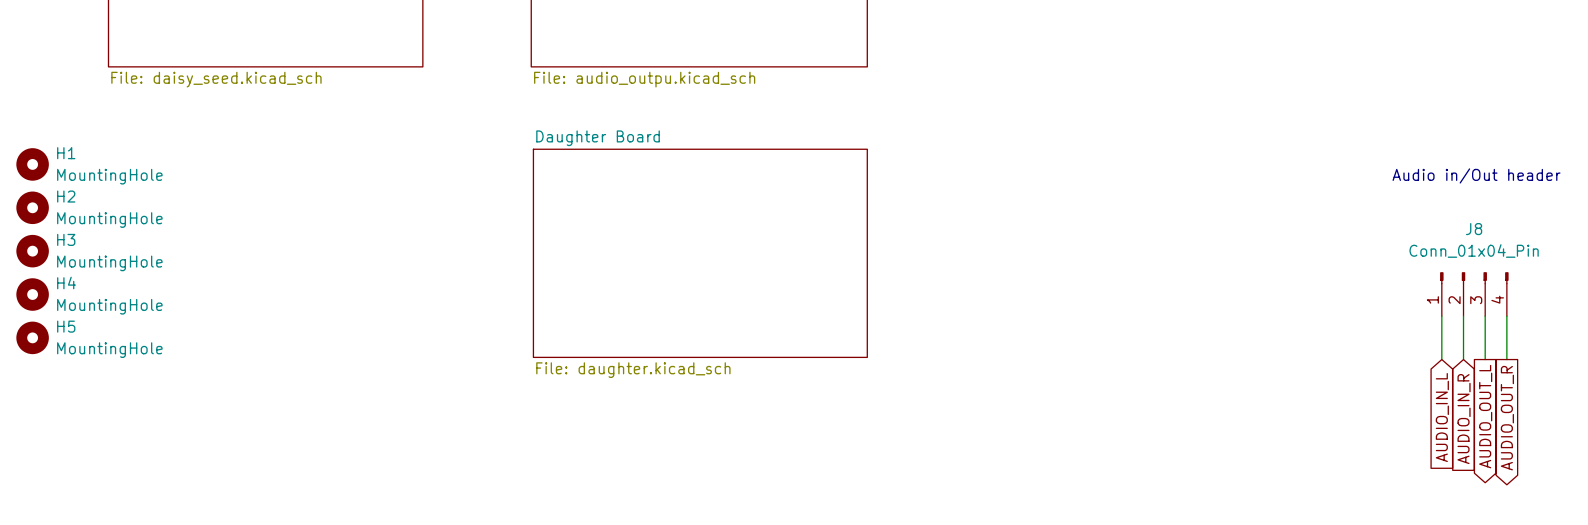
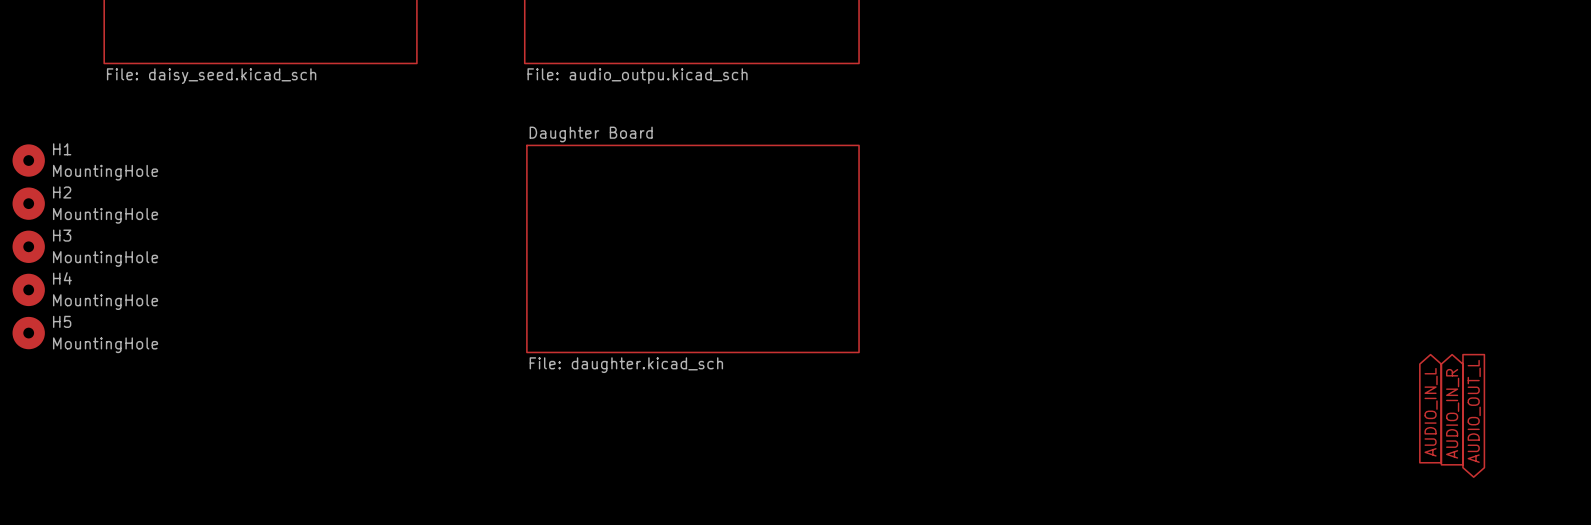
text: Audio in/Out header (1476, 175) -> none
J8: Conn_01x04_Pin (1474, 294) -> none
wire: (1441, 316) (1441, 359) -> none
wire: (1463, 316) (1463, 359) -> none
wire: (1485, 316) (1485, 359) -> none
wire: (1506, 316) (1506, 359) -> none
global label: AUDIO_OUT_R (1507, 418) -> none

